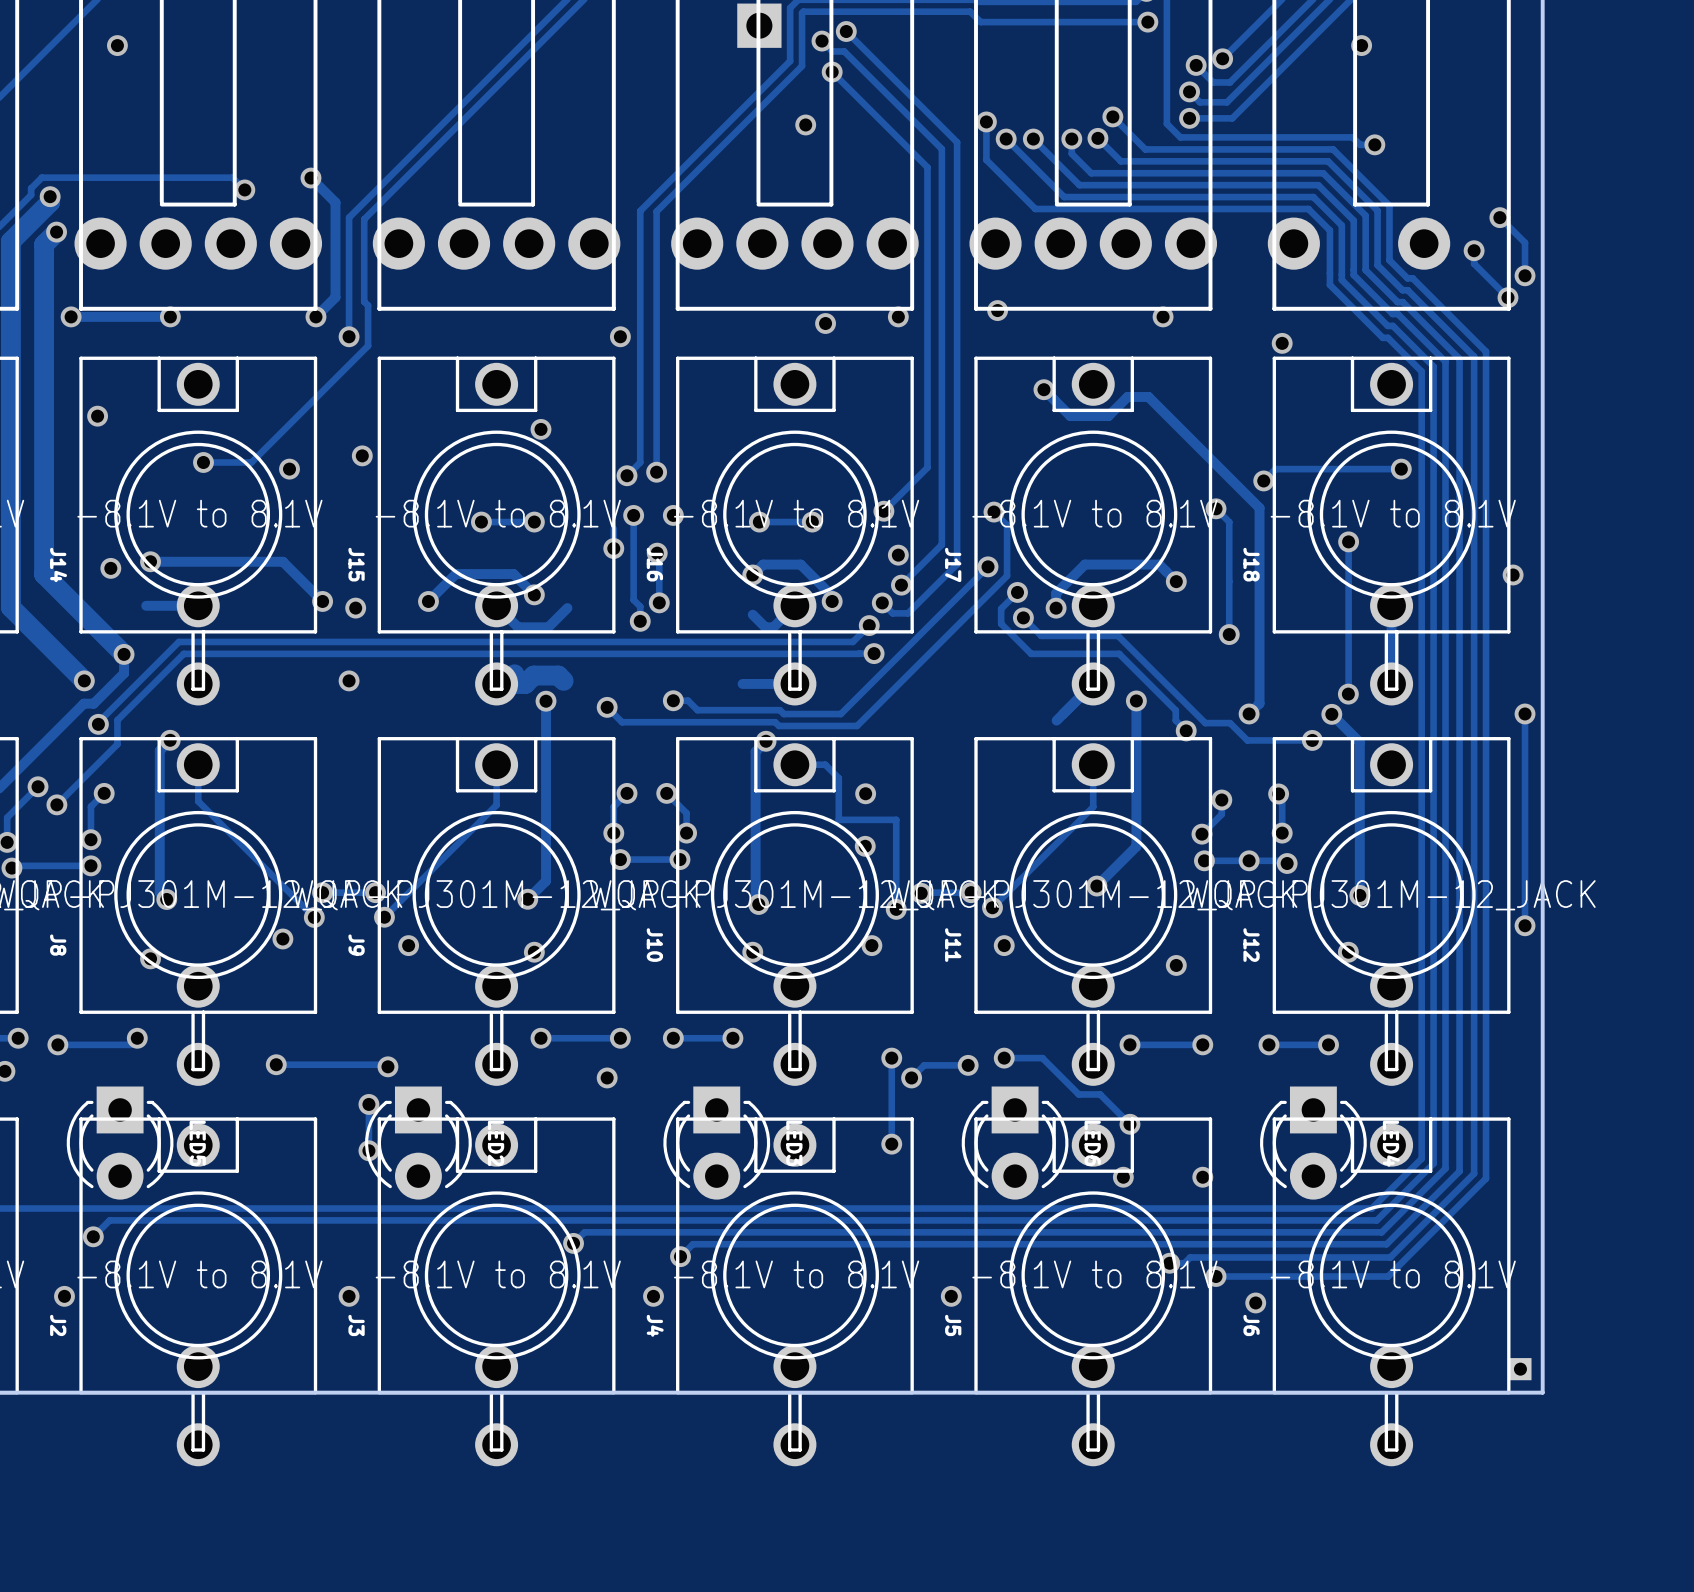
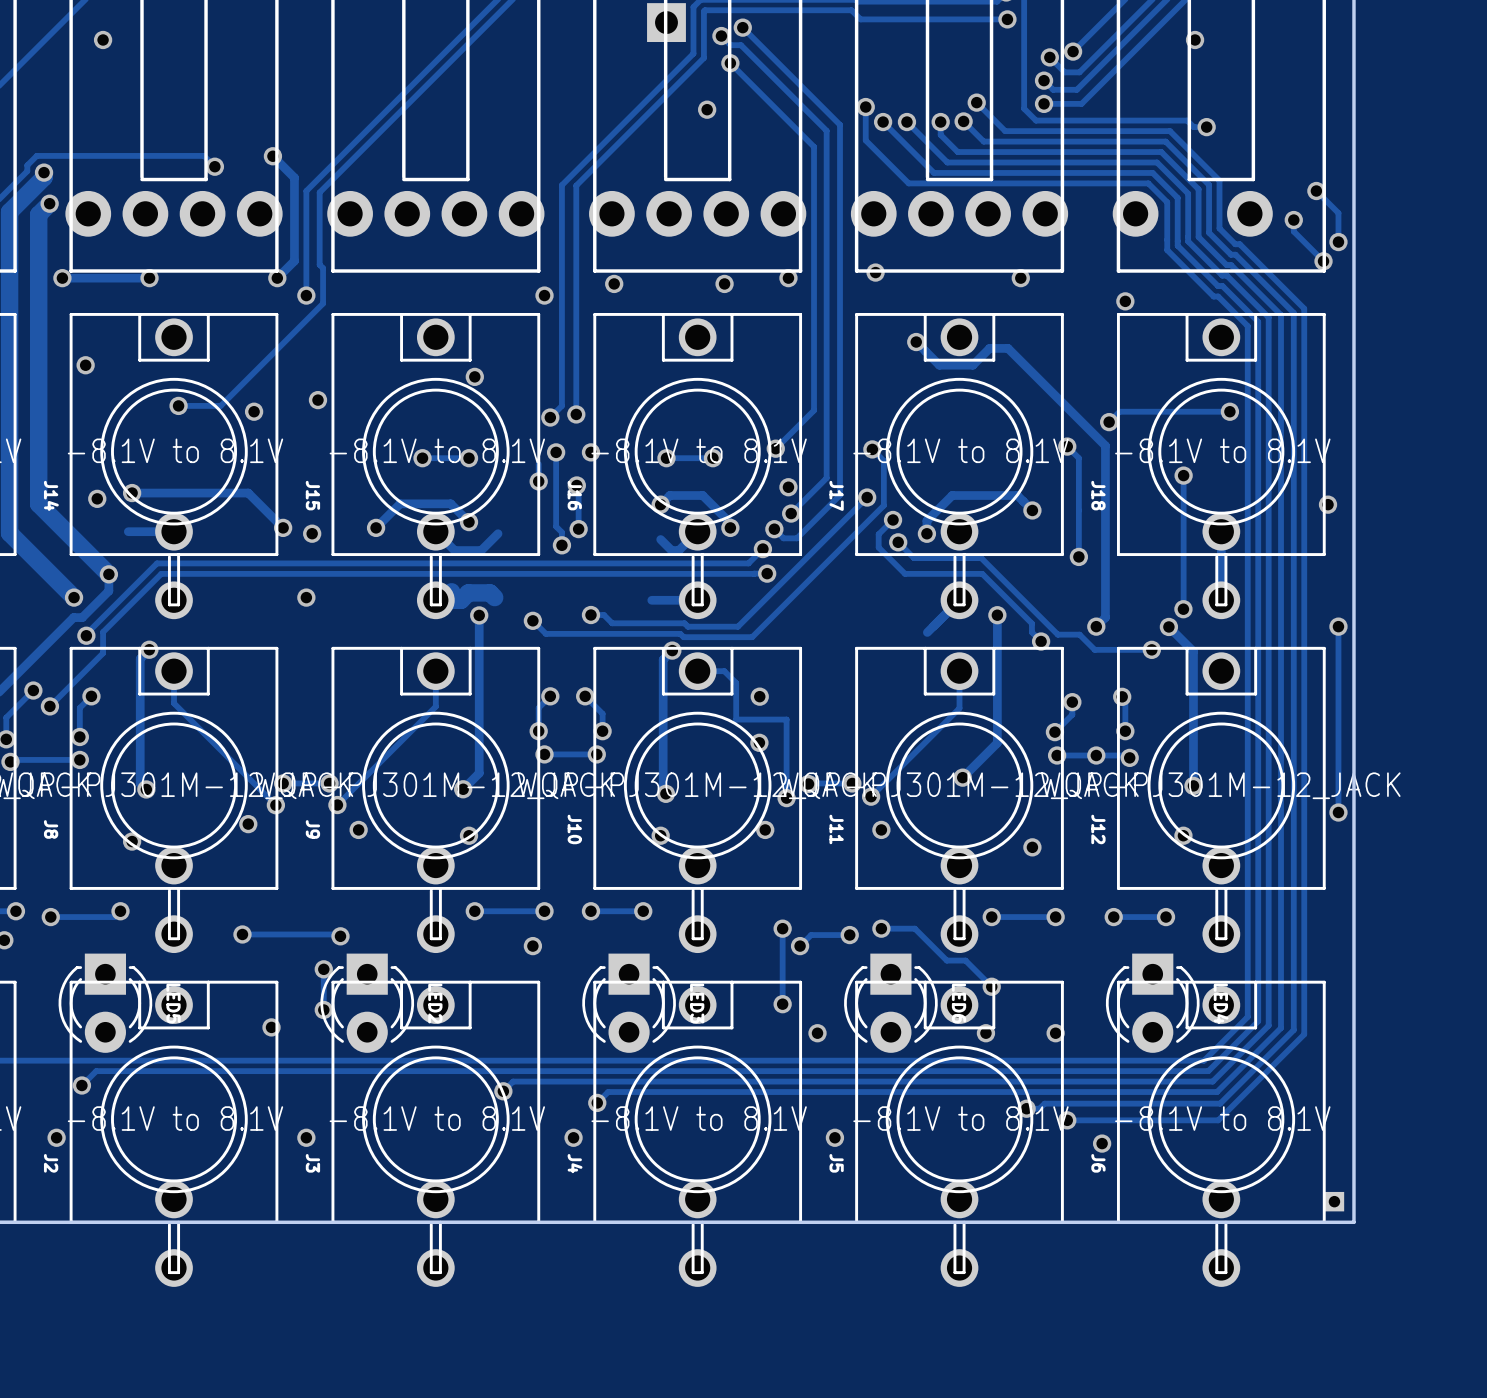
via: none -> (614, 283)
via: none -> (271, 1027)
via: none -> (817, 1033)

